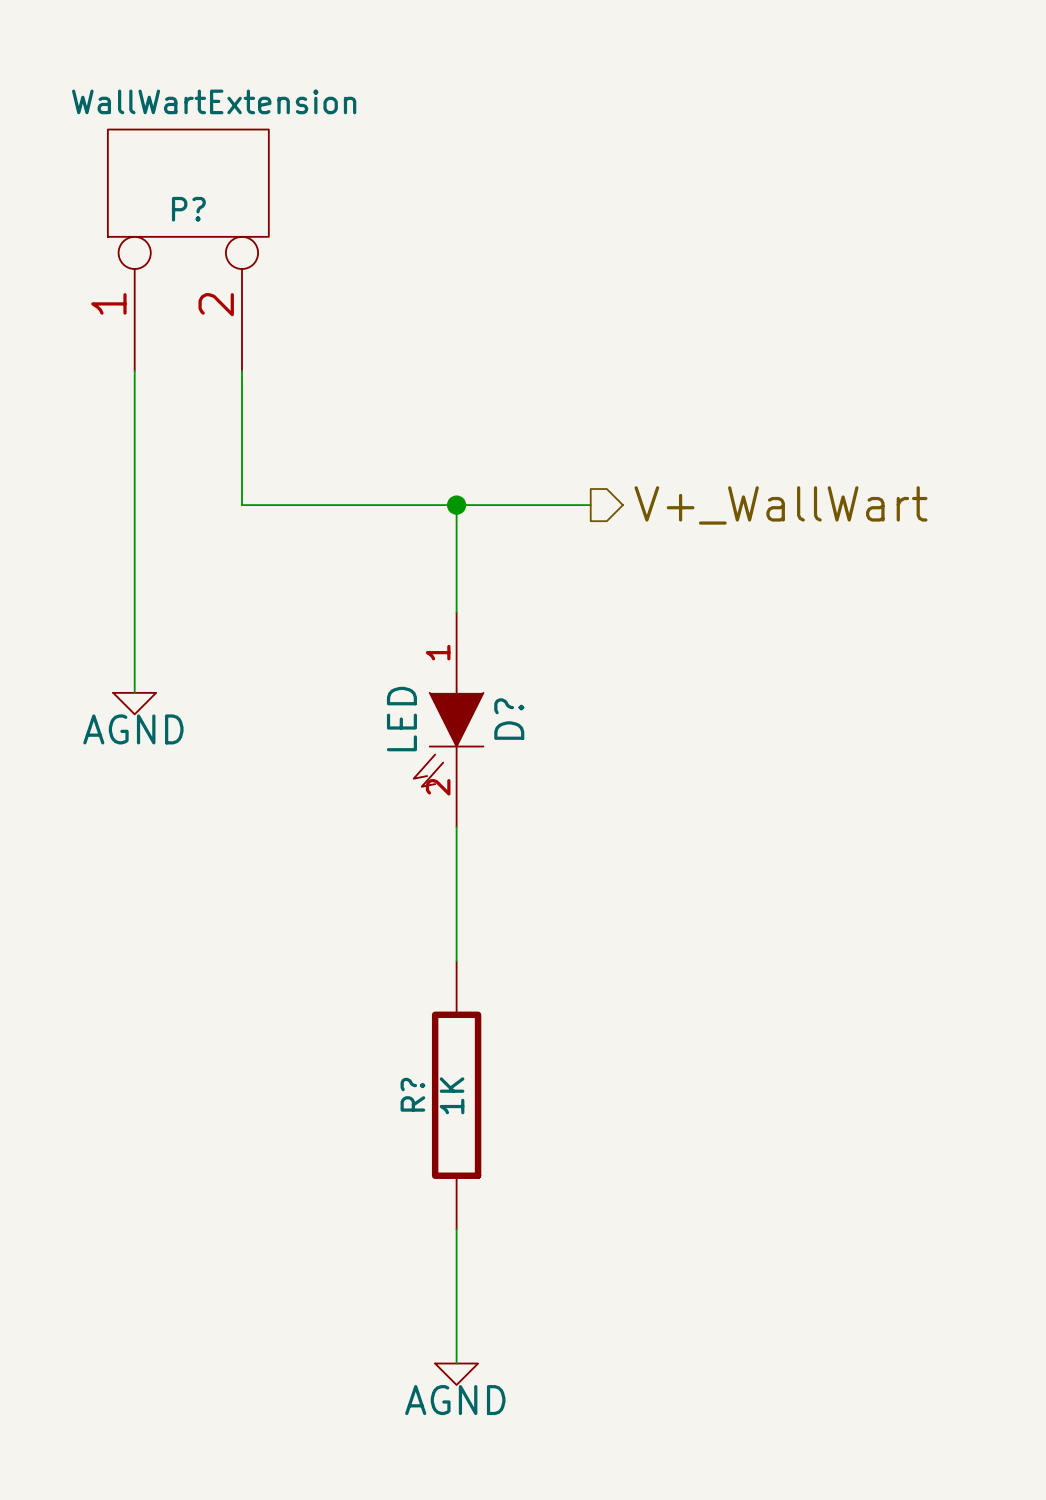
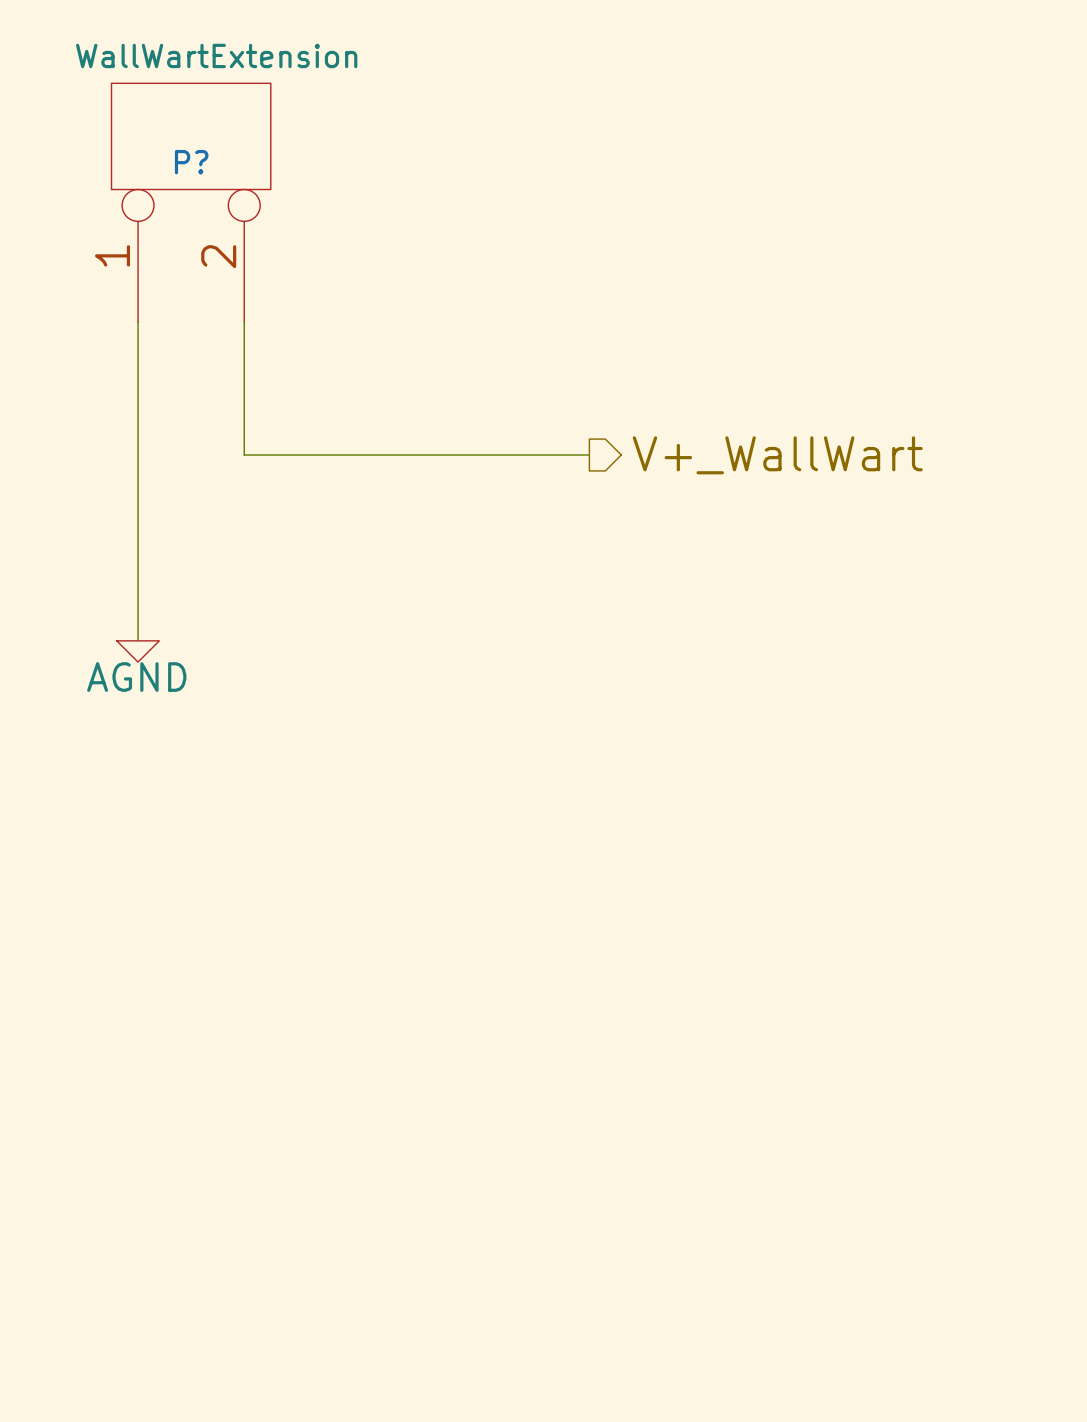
wire: (456, 505) (456, 612) -> none
junction: (456, 505) -> none
D?: LED (448, 719) -> none
wire: (456, 827) (456, 961) -> none
R?: 1K (456, 1095) -> none
wire: (456, 1229) (456, 1363) -> none
power symbol: AGND (456, 1374) -> none

